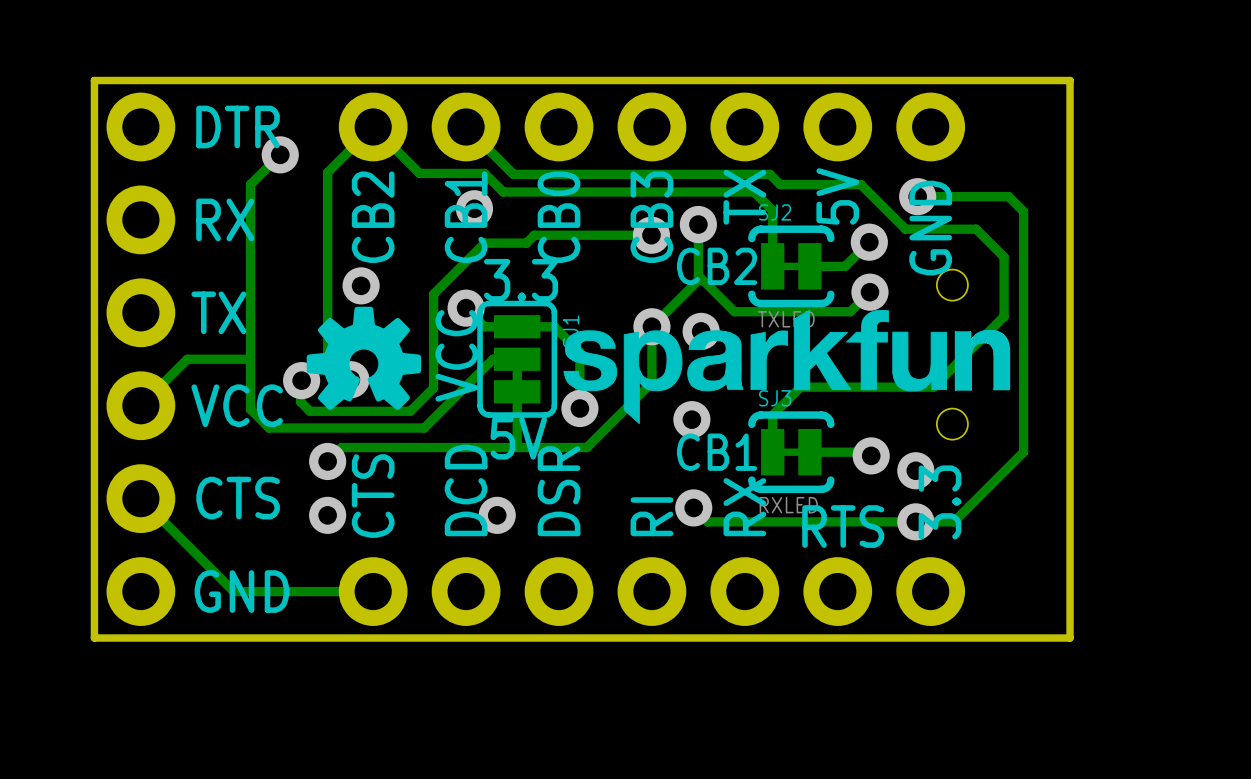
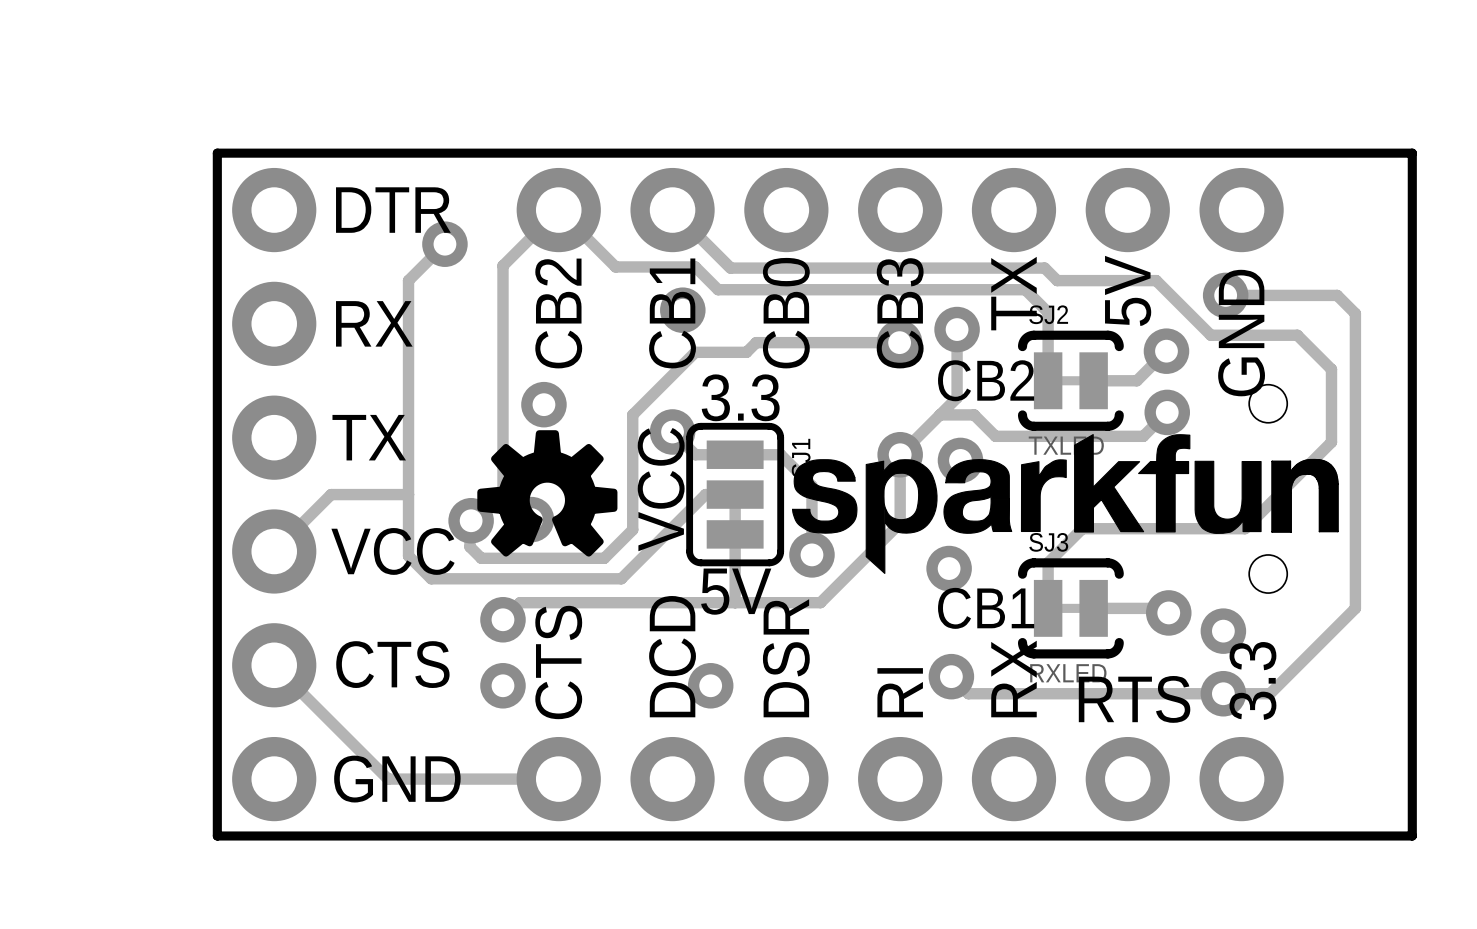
track: (698, 275) (734, 311) -> (940, 414) (974, 414) (995, 436) (1001, 436)

